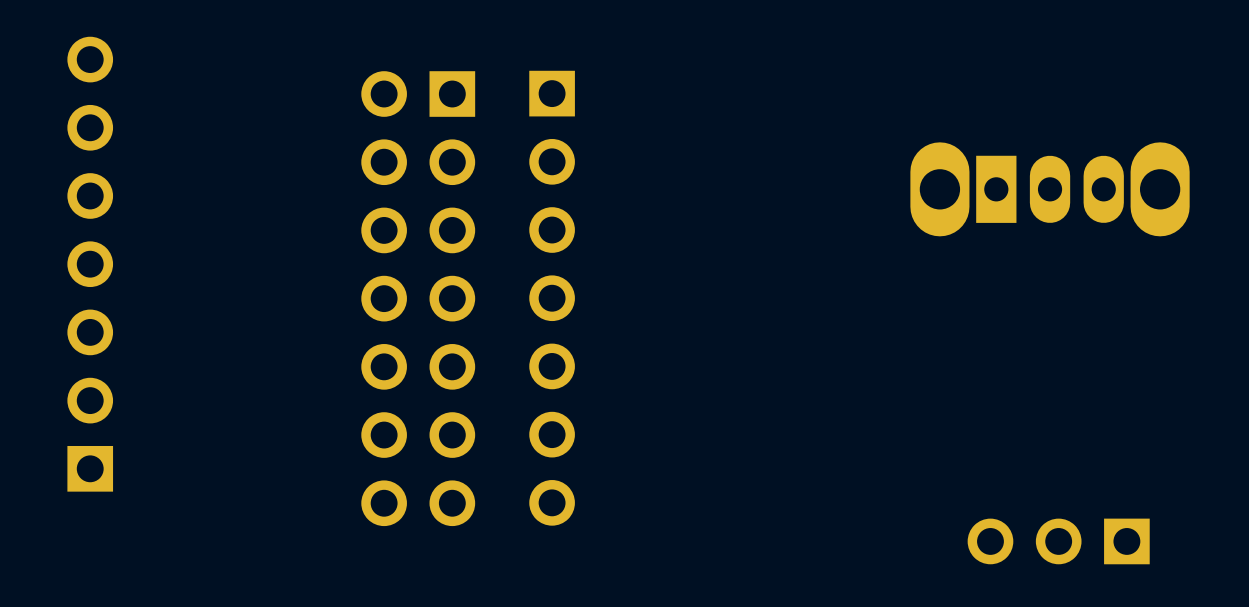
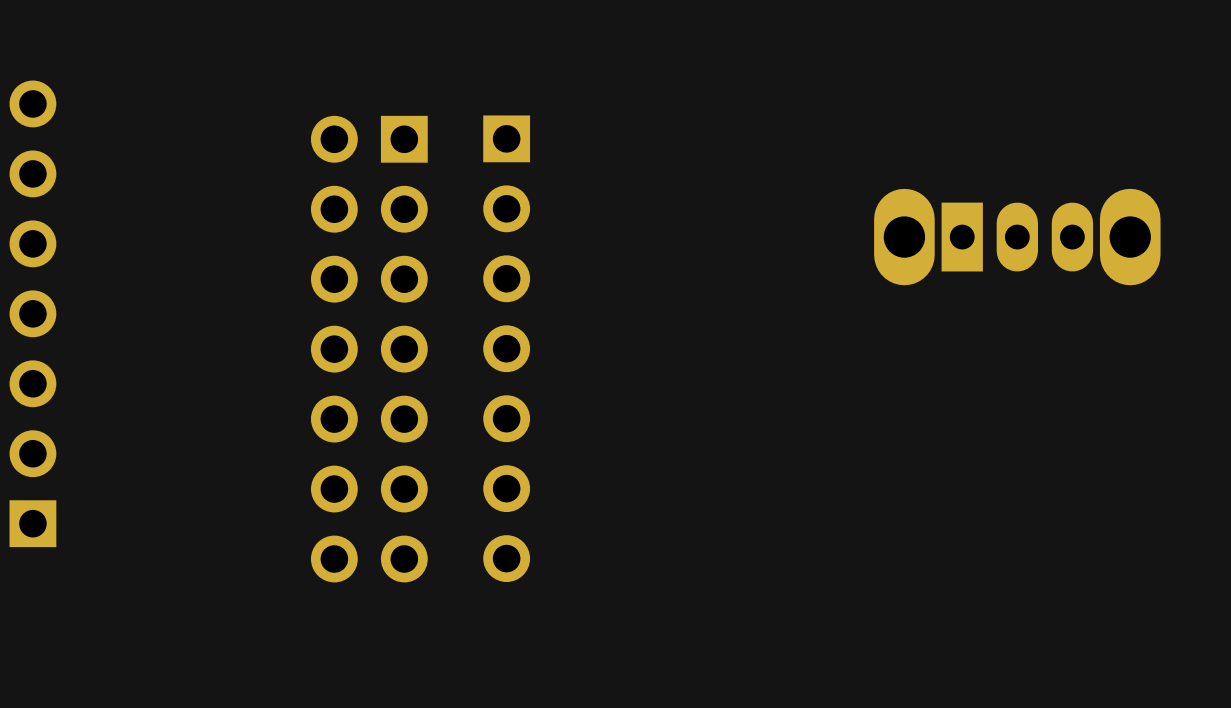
part: (1058, 541) -> none

